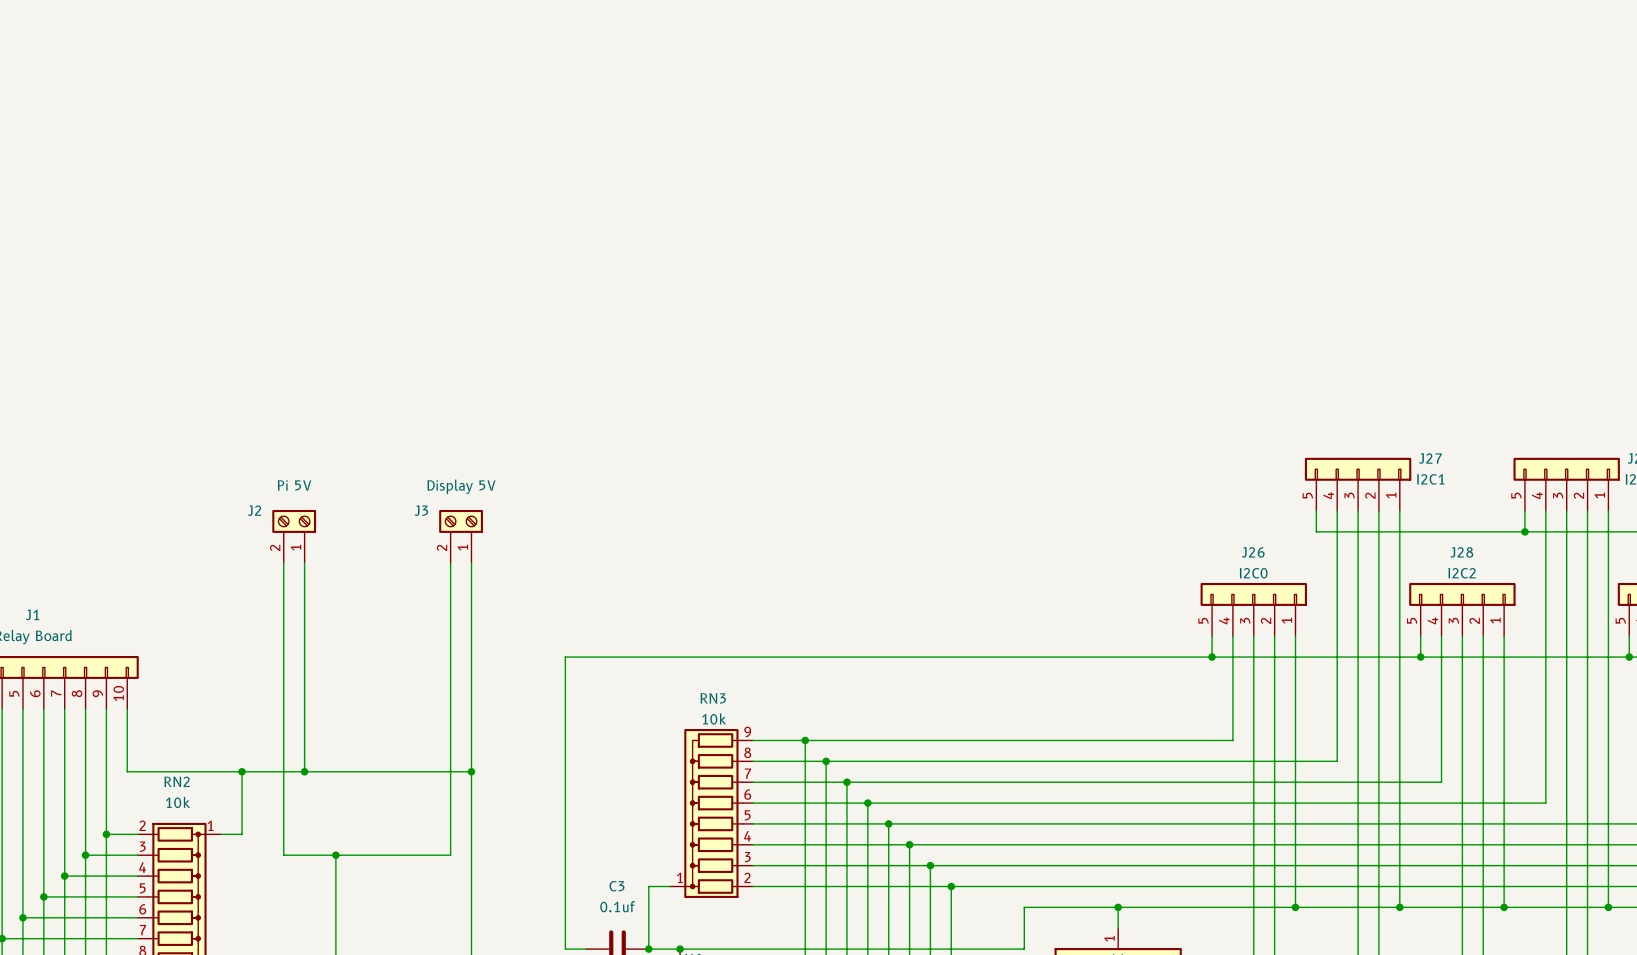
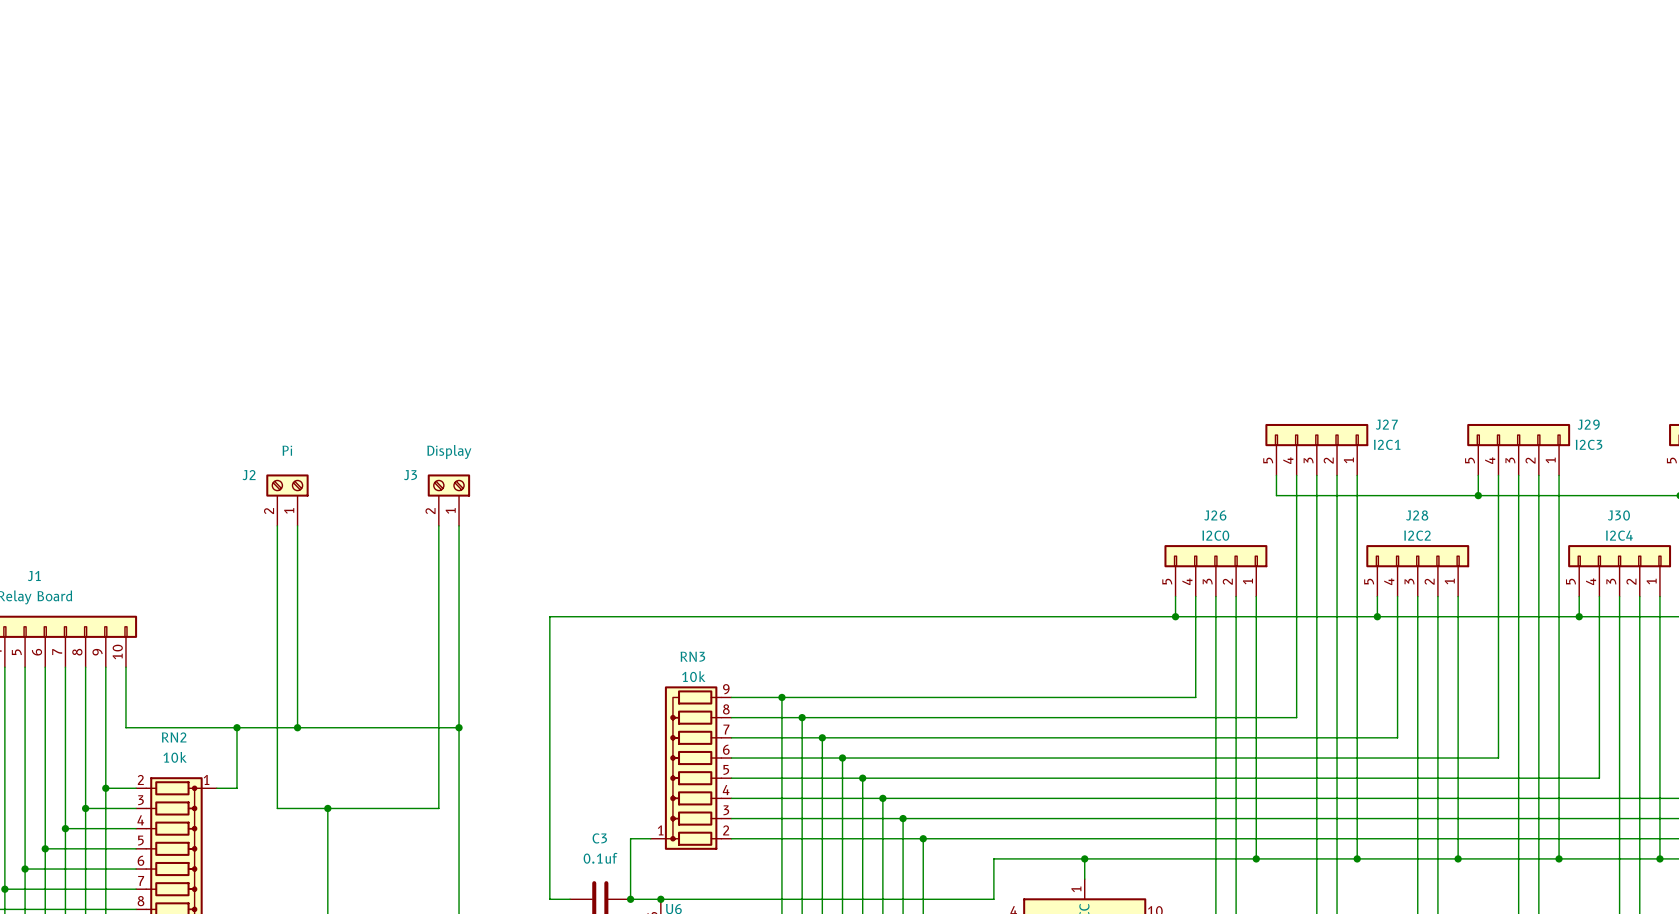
J2 value: Pi 5V (294, 485) -> Pi (287, 450)
J3 value: Display 5V (461, 486) -> Display (449, 452)

